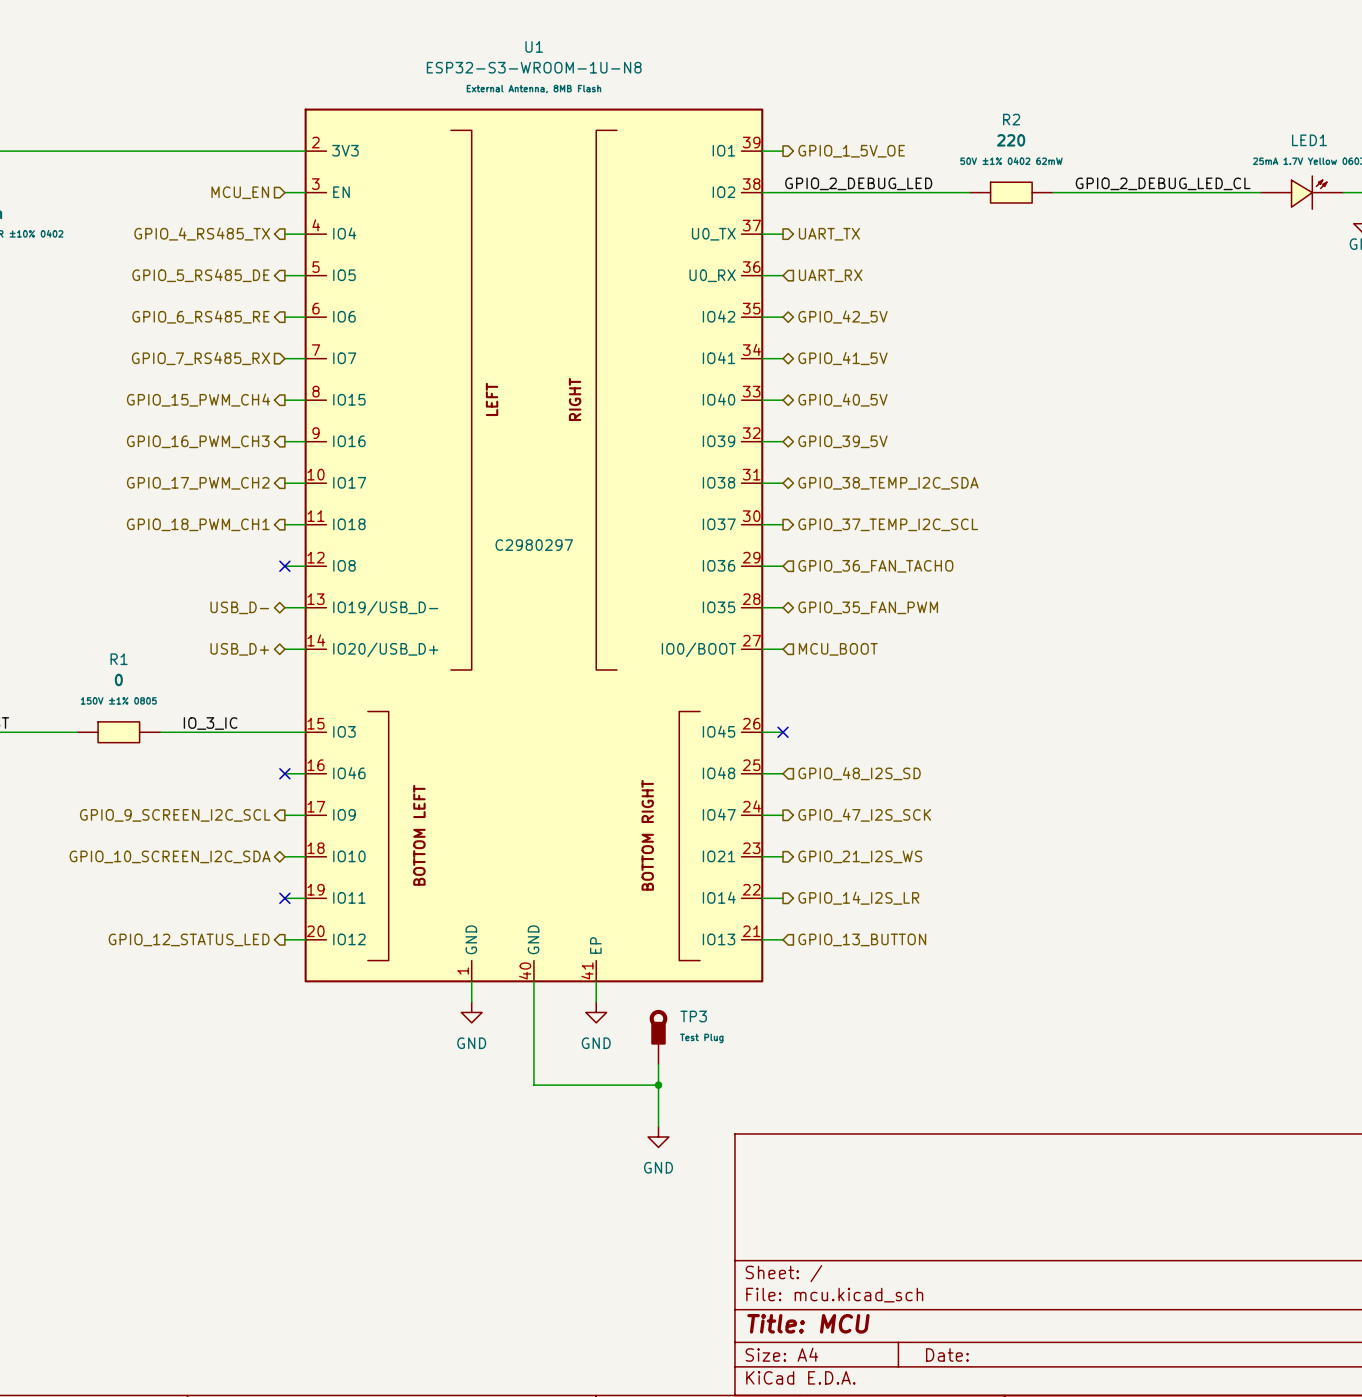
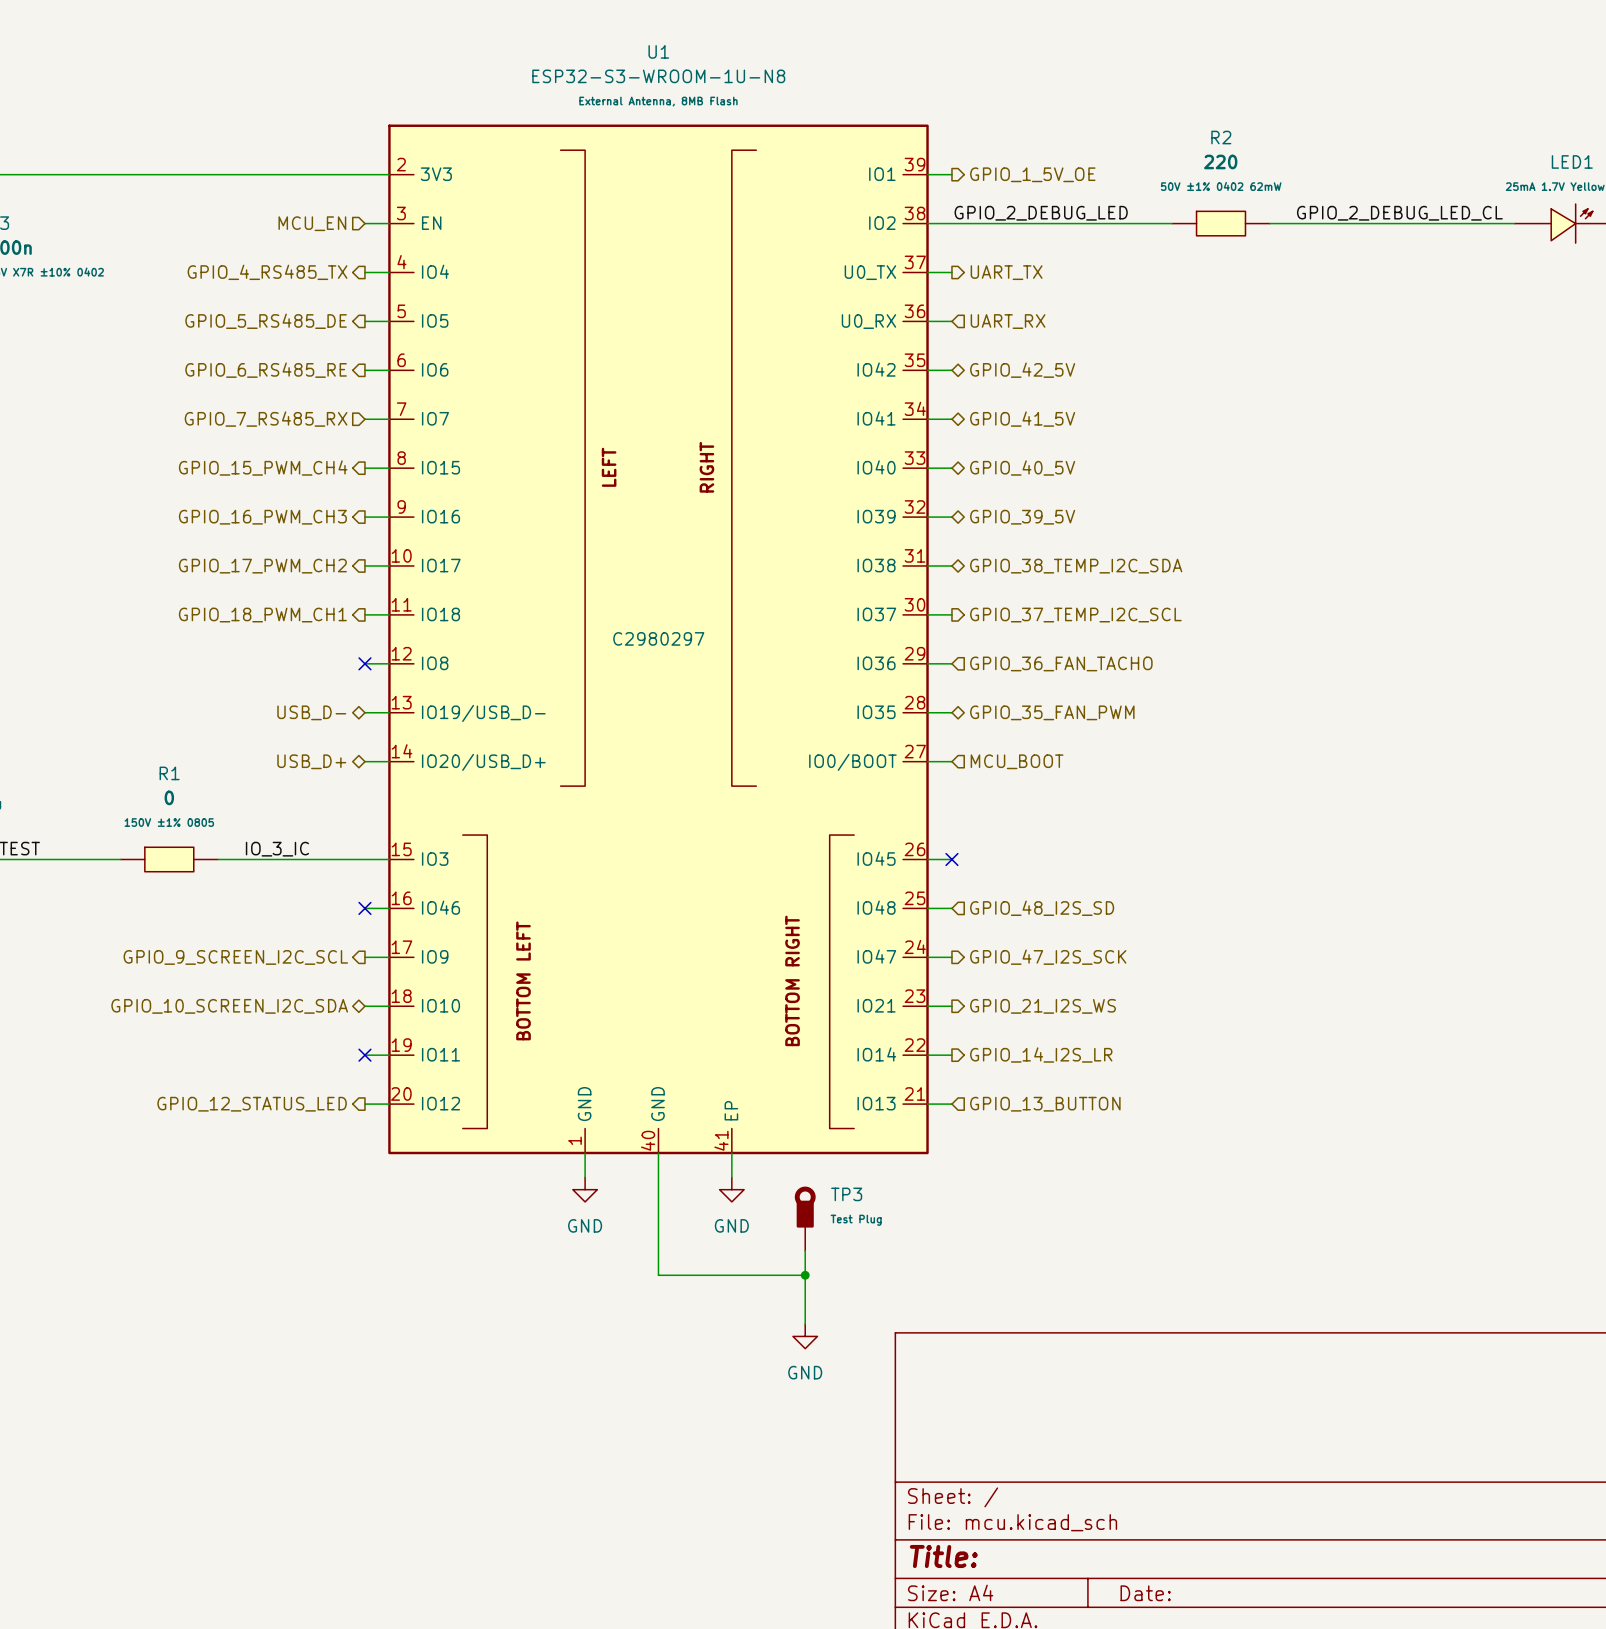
title block: Title: MCU (808, 1323) -> Title: (943, 1556)

